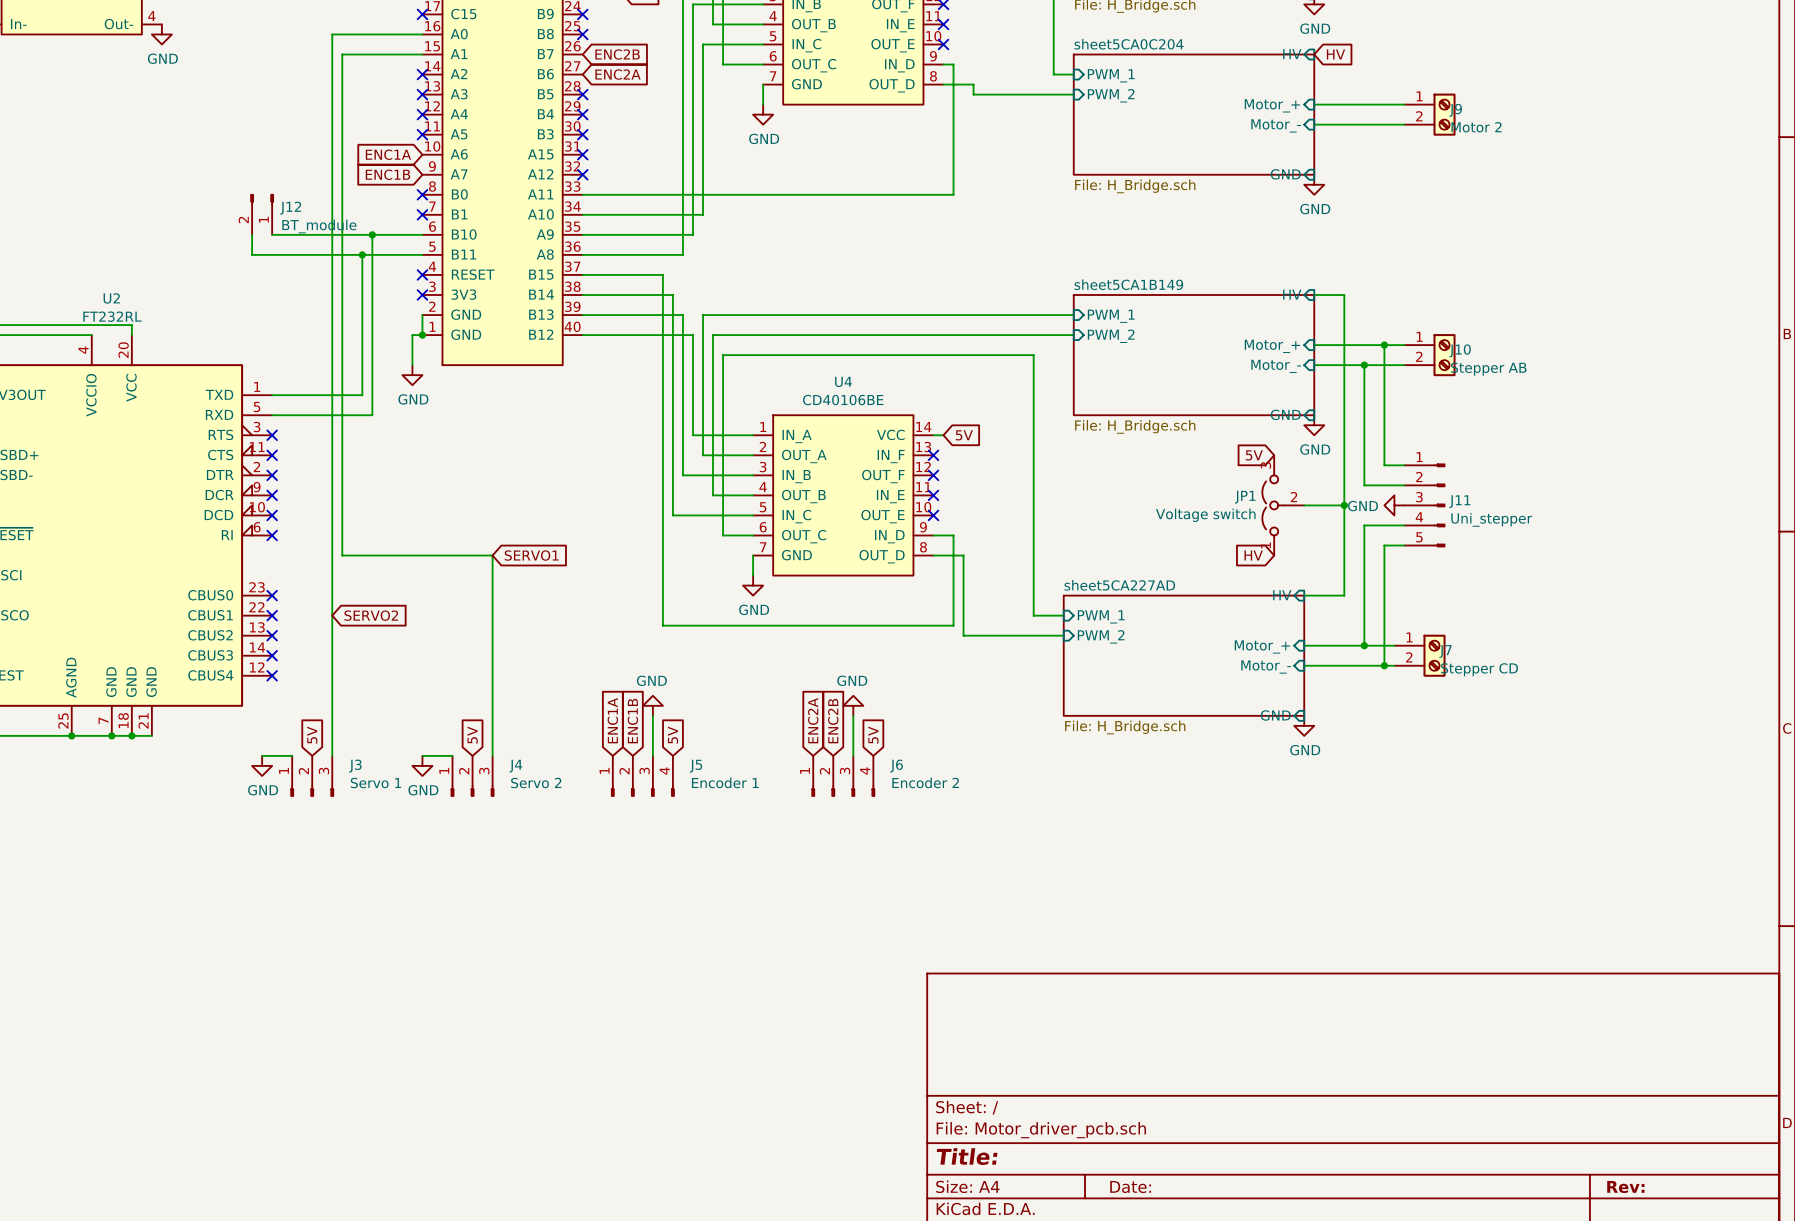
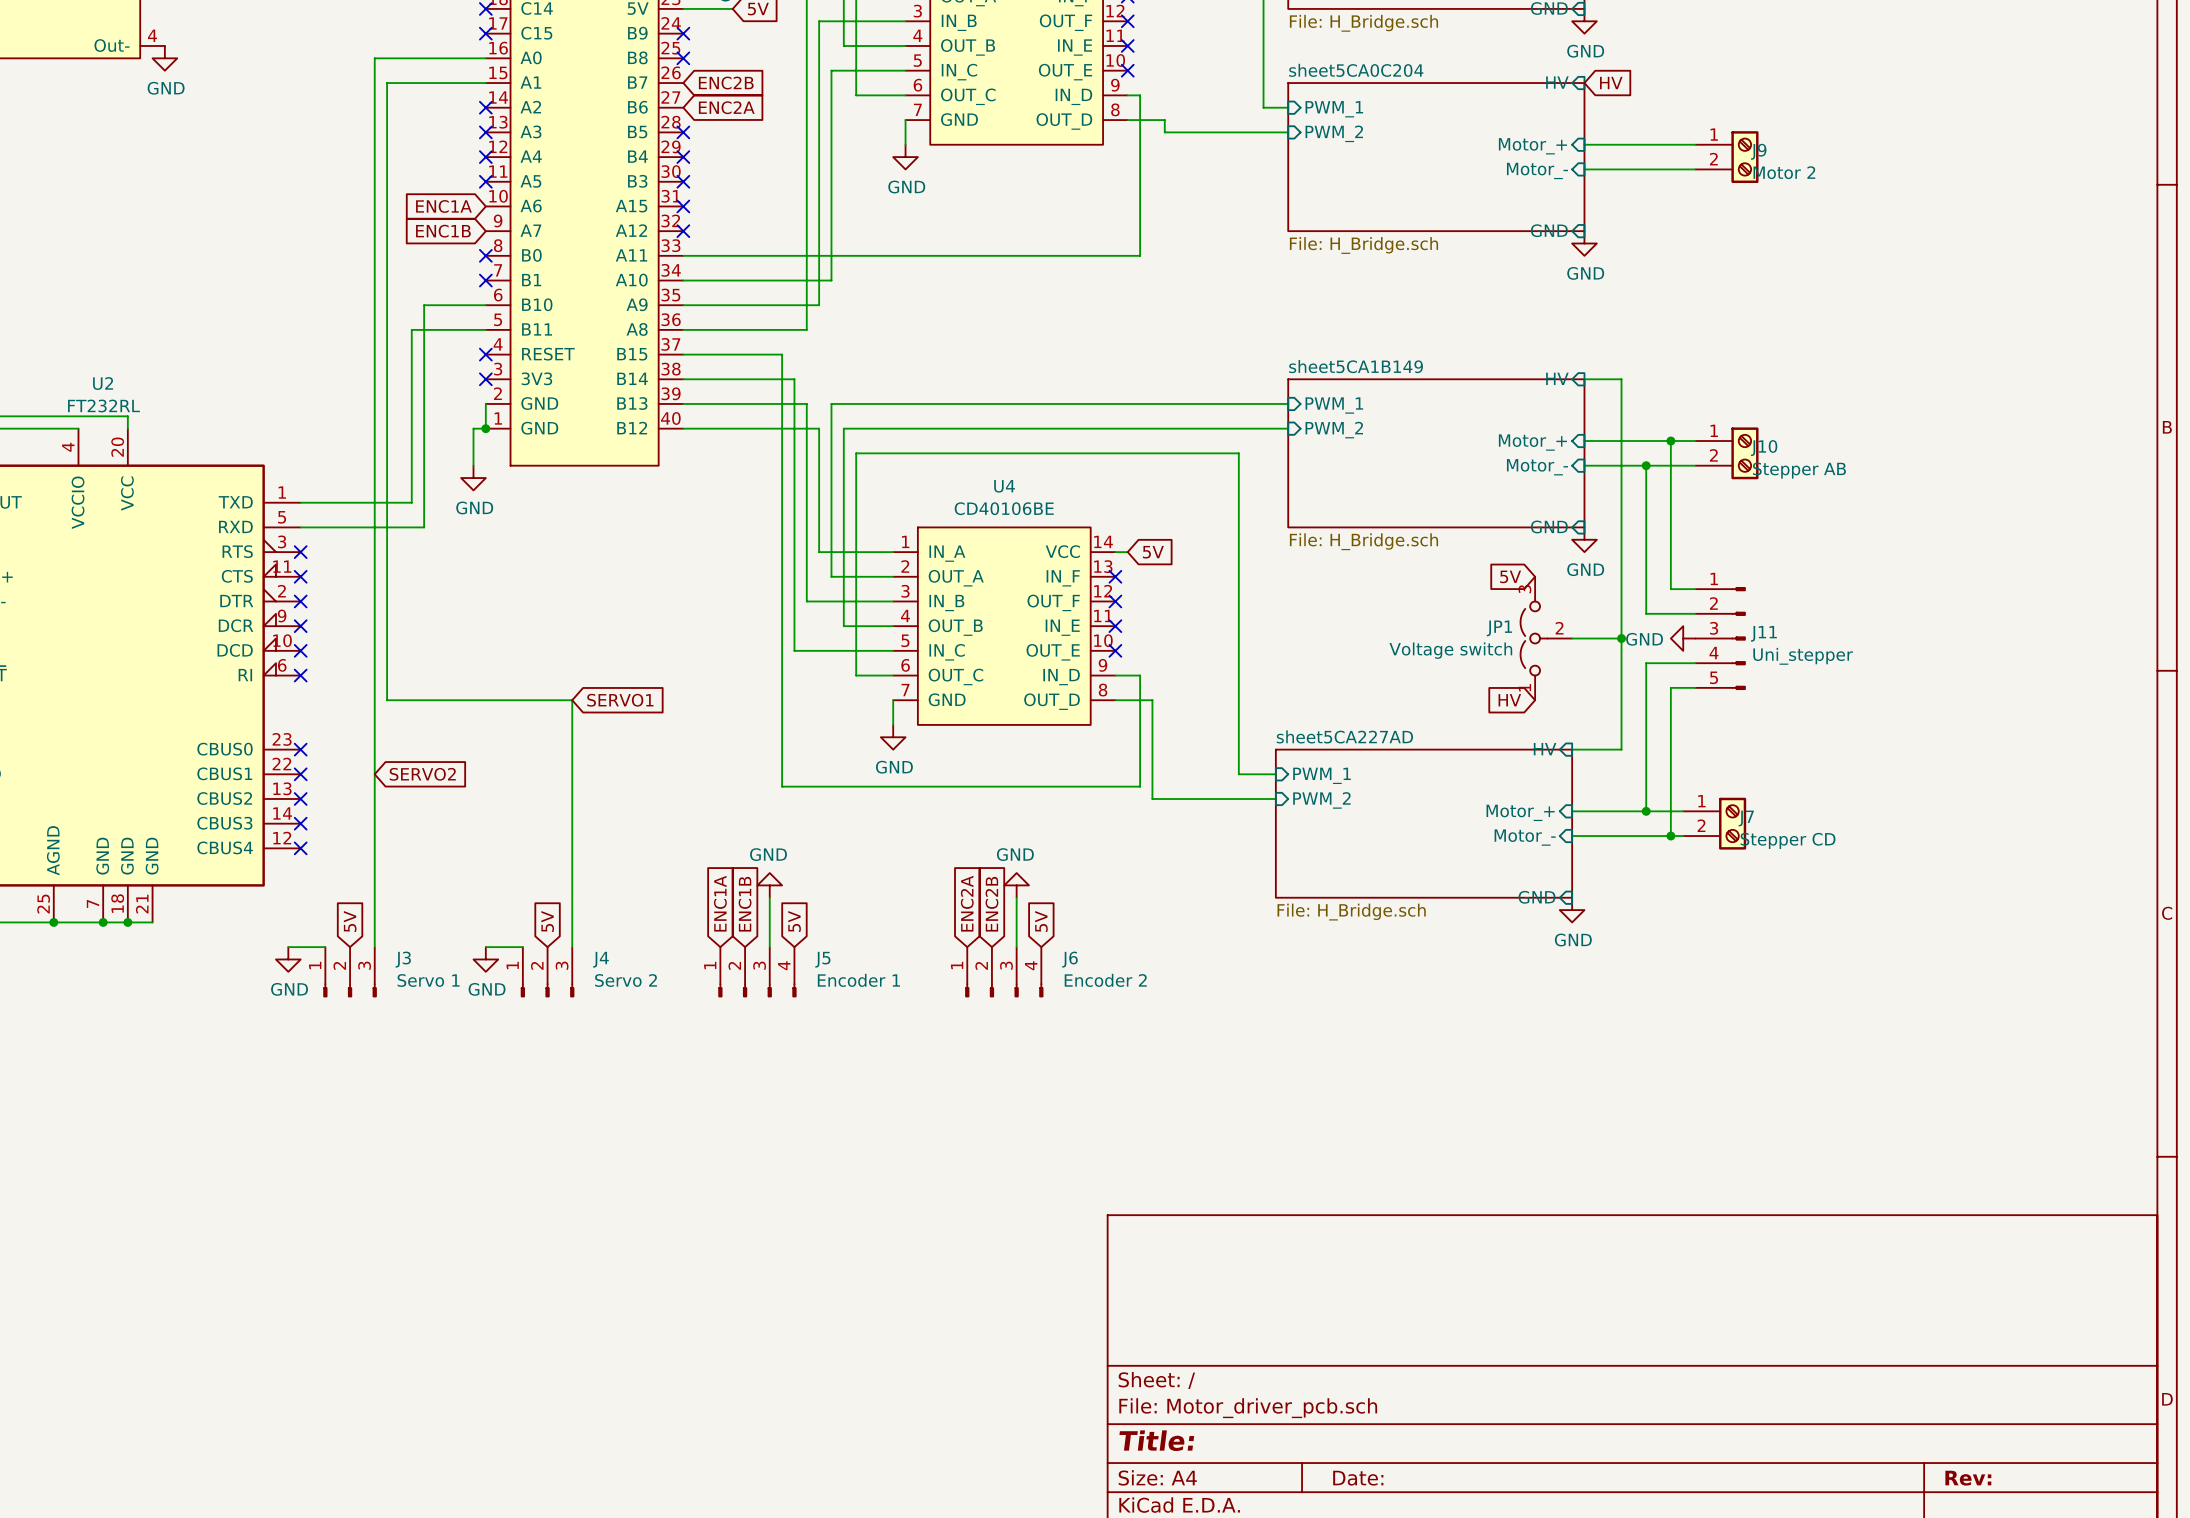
J12: BT_module (262, 214) -> none
wire: (252, 234) (252, 254) (362, 254) -> none
wire: (272, 234) (372, 234) -> none
junction: (372, 234) -> none
junction: (362, 254) -> none

